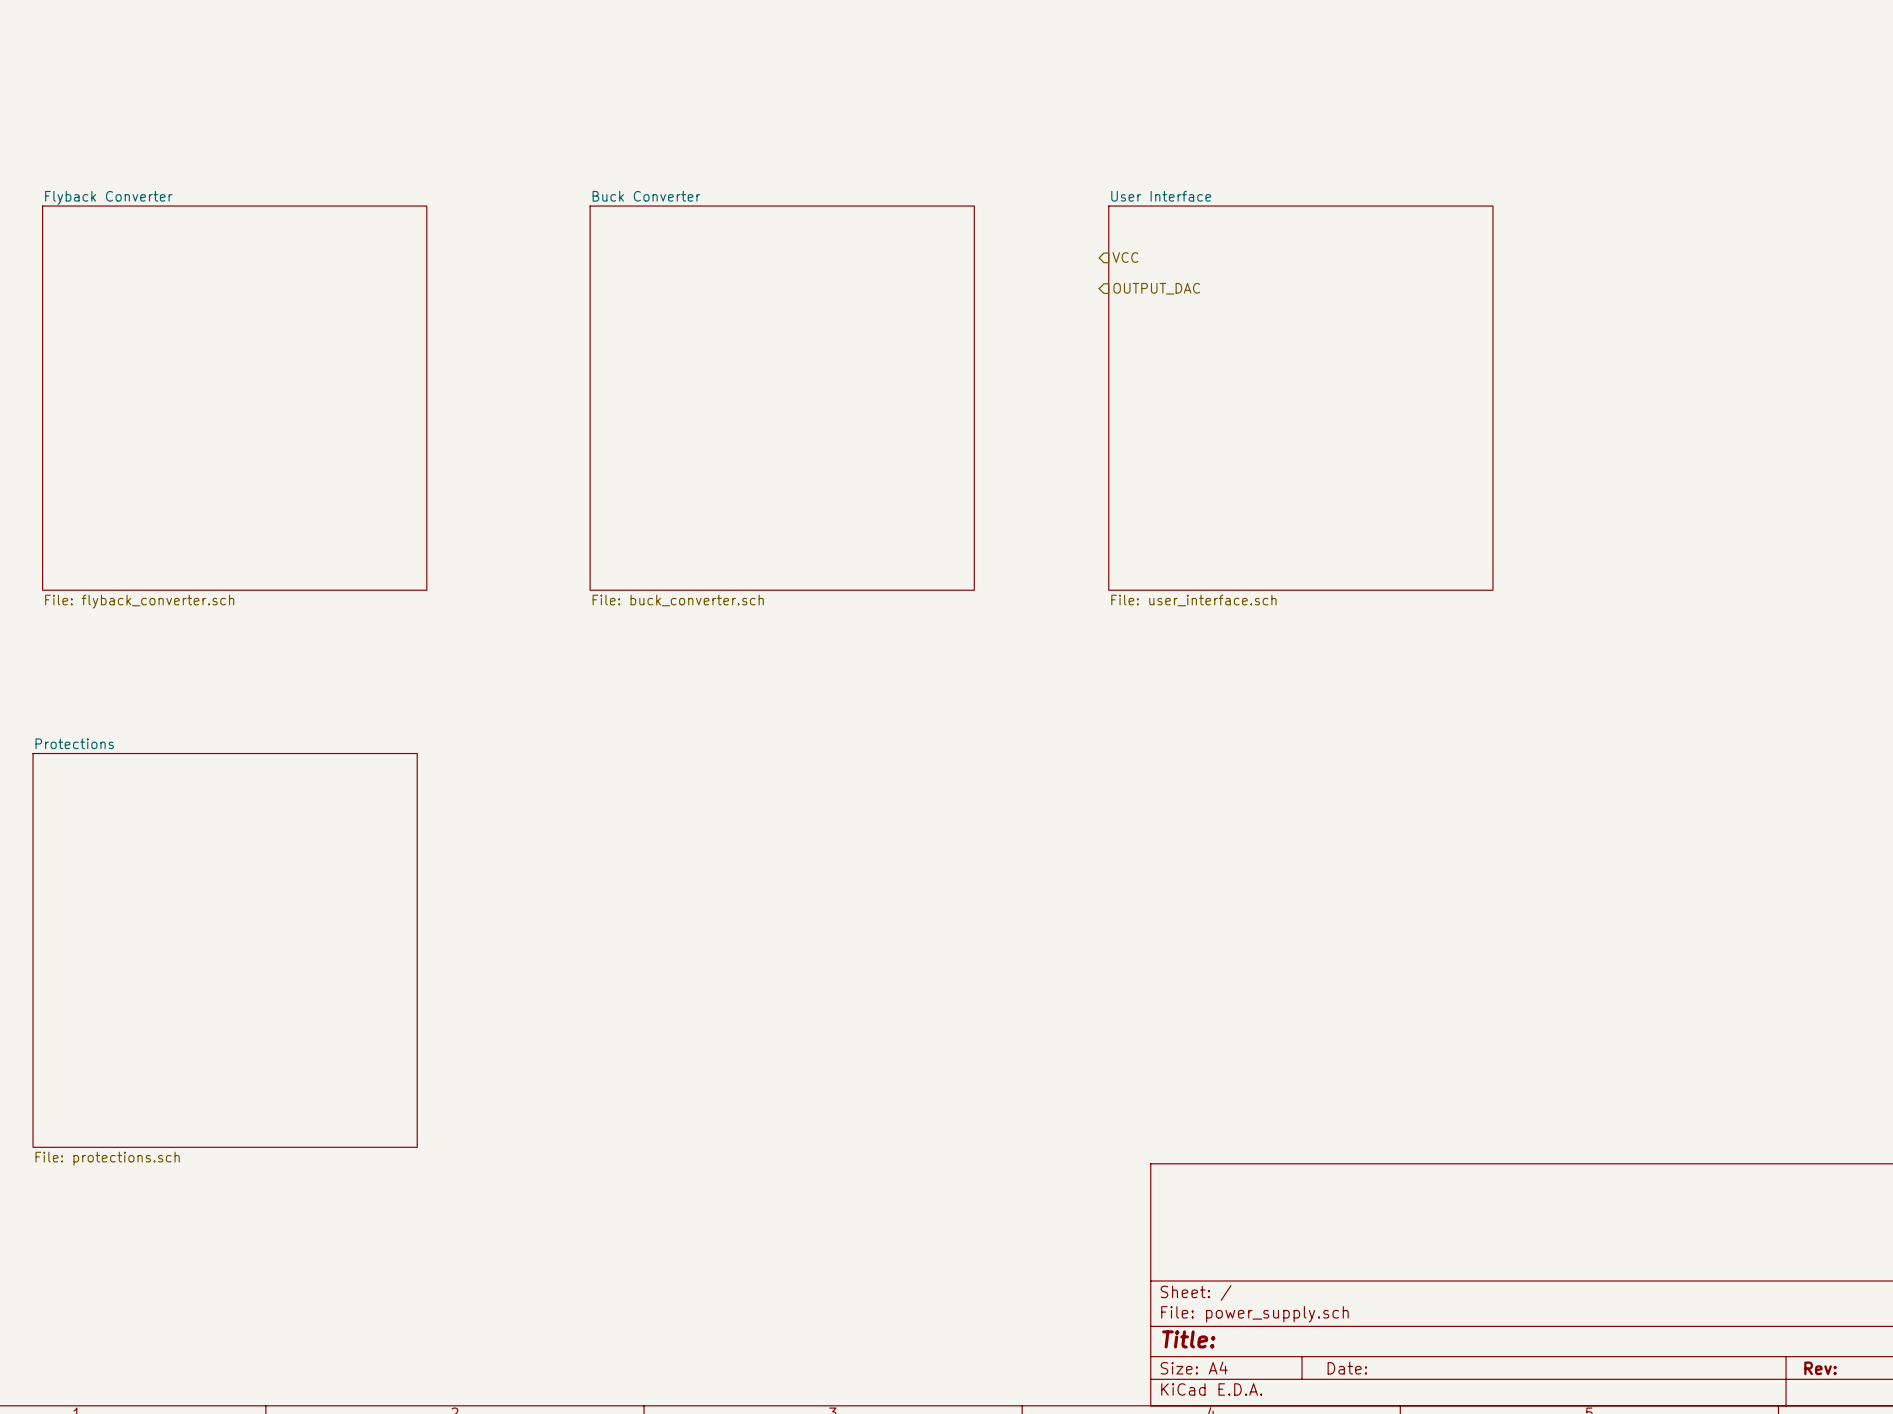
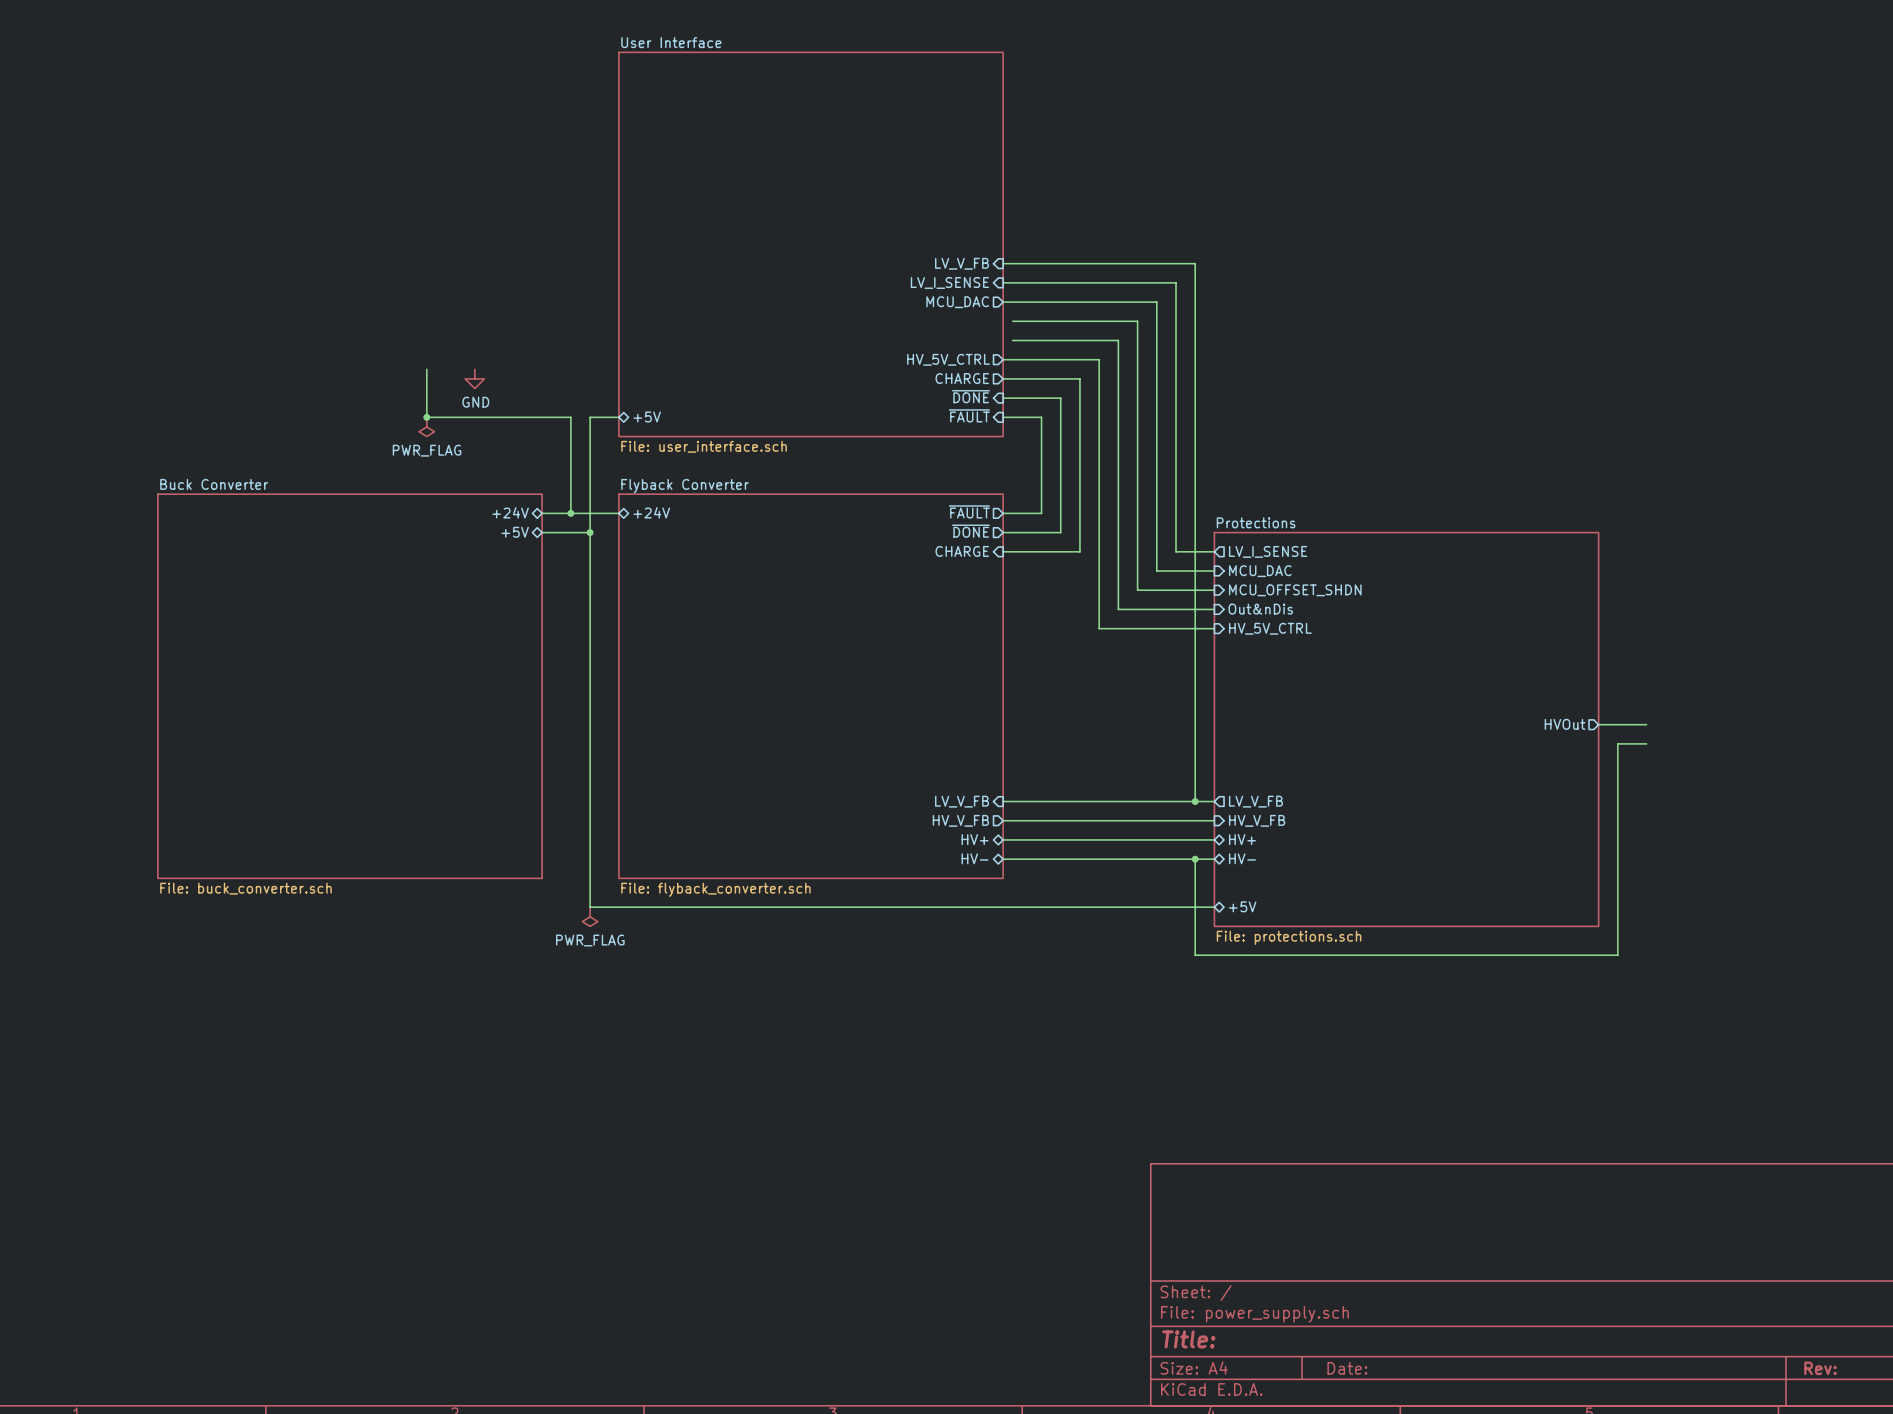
sheet User Interface: none -> File: user_interface.sch (811, 244)
hierarchical label: VCC (1125, 257) -> none
sheet pin: none -> LV_V_FB (962, 263)
wire: none -> (1003, 263) (1195, 263) (1195, 801)
sheet pin: none -> LV_I_SENSE (949, 282)
wire: none -> (1003, 282) (1176, 282) (1176, 551) (1214, 551)
hierarchical label: OUTPUT_DAC (1156, 288) -> none
sheet pin: none -> MCU_DAC (957, 302)
wire: none -> (1003, 302) (1156, 302) (1156, 571) (1214, 571)
wire: none -> (1012, 321) (1137, 321) (1137, 590) (1214, 590)
wire: none -> (1012, 340) (1118, 340) (1118, 609) (1214, 609)
sheet pin: none -> HV_5V_CTRL (948, 359)
wire: none -> (1003, 359) (1099, 359) (1099, 628) (1214, 628)
wire: none -> (426, 369) (426, 417) (570, 417) (570, 513)
power symbol: none -> GND (474, 378)
sheet pin: none -> CHARGE (962, 378)
wire: none -> (1003, 378) (1079, 378) (1079, 551) (1003, 551)
sheet pin: none -> ~{DONE} (970, 396)
sheet Flyback Converter: File: flyback_converter.sch (234, 398) -> none
sheet Buck Converter: File: buck_converter.sch (782, 398) -> none
wire: none -> (1003, 398) (1060, 398) (1060, 532) (1003, 532)
sheet User Interface: File: user_interface.sch (1300, 398) -> none
sheet pin: none -> ~{FAULT} (969, 415)
sheet pin: none -> +5V (647, 416)
junction: none -> (426, 417)
wire: none -> (618, 417) (590, 417) (590, 907) (1214, 907)
wire: none -> (1003, 417) (1041, 417) (1041, 513) (1003, 513)
power symbol: none -> PWR_FLAG (426, 426)
sheet pin: none -> ~{FAULT} (969, 511)
sheet pin: none -> +24V (510, 512)
sheet pin: none -> +24V (651, 512)
wire: none -> (542, 513) (618, 513)
junction: none -> (570, 513)
sheet pin: none -> ~{DONE} (970, 531)
sheet pin: none -> +5V (515, 532)
wire: none -> (542, 532) (590, 532)
junction: none -> (590, 532)
sheet pin: none -> CHARGE (962, 551)
sheet pin: none -> LV_I_SENSE (1268, 551)
sheet pin: none -> MCU_DAC (1260, 571)
sheet pin: none -> MCU_OFFSET_SHDN (1295, 590)
sheet pin: none -> Out&nDis (1260, 609)
sheet pin: none -> HV_5V_CTRL (1270, 628)
sheet Buck Converter: none -> File: buck_converter.sch (349, 686)
sheet Flyback Converter: none -> File: flyback_converter.sch (811, 686)
sheet pin: none -> HVOut (1565, 724)
wire: none -> (1598, 724) (1646, 724)
sheet Protections: none -> File: protections.sch (1406, 729)
wire: none -> (1646, 743) (1617, 743) (1617, 955) (1195, 955) (1195, 859)
sheet pin: none -> LV_V_FB (962, 801)
wire: none -> (1003, 801) (1214, 801)
junction: none -> (1195, 801)
sheet pin: none -> LV_V_FB (1255, 801)
sheet pin: none -> HV_V_FB (960, 820)
wire: none -> (1003, 820) (1214, 820)
sheet pin: none -> HV_V_FB (1257, 820)
sheet pin: none -> HV+ (975, 839)
wire: none -> (1003, 839) (1214, 839)
sheet pin: none -> HV+ (1242, 839)
sheet pin: none -> HV- (975, 858)
sheet pin: none -> HV- (1242, 858)
wire: none -> (1003, 859) (1214, 859)
junction: none -> (1195, 859)
sheet pin: none -> +5V (1242, 906)
power symbol: none -> PWR_FLAG (590, 916)
sheet Protections: File: protections.sch (225, 950) -> none

